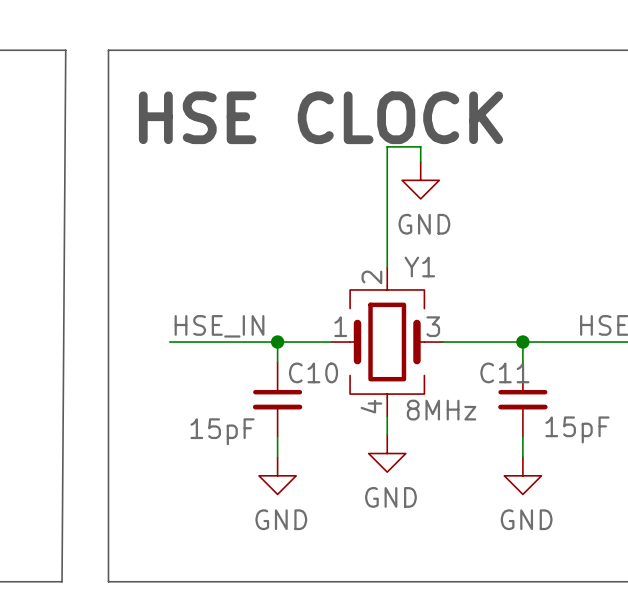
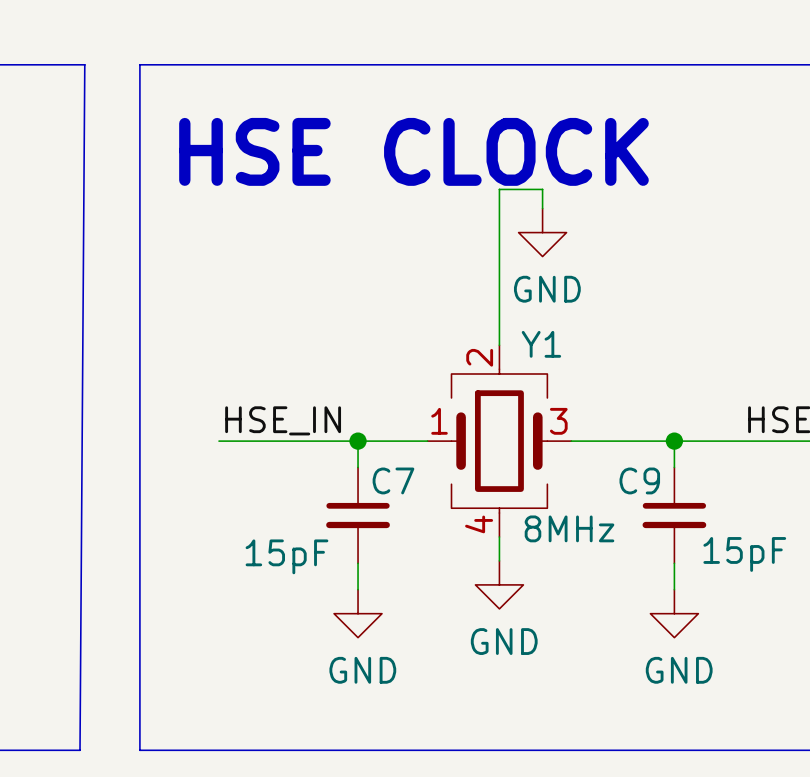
C10 name: C10 (313, 372) -> C7 (393, 480)
C11 name: C11 (504, 372) -> C9 (639, 480)

